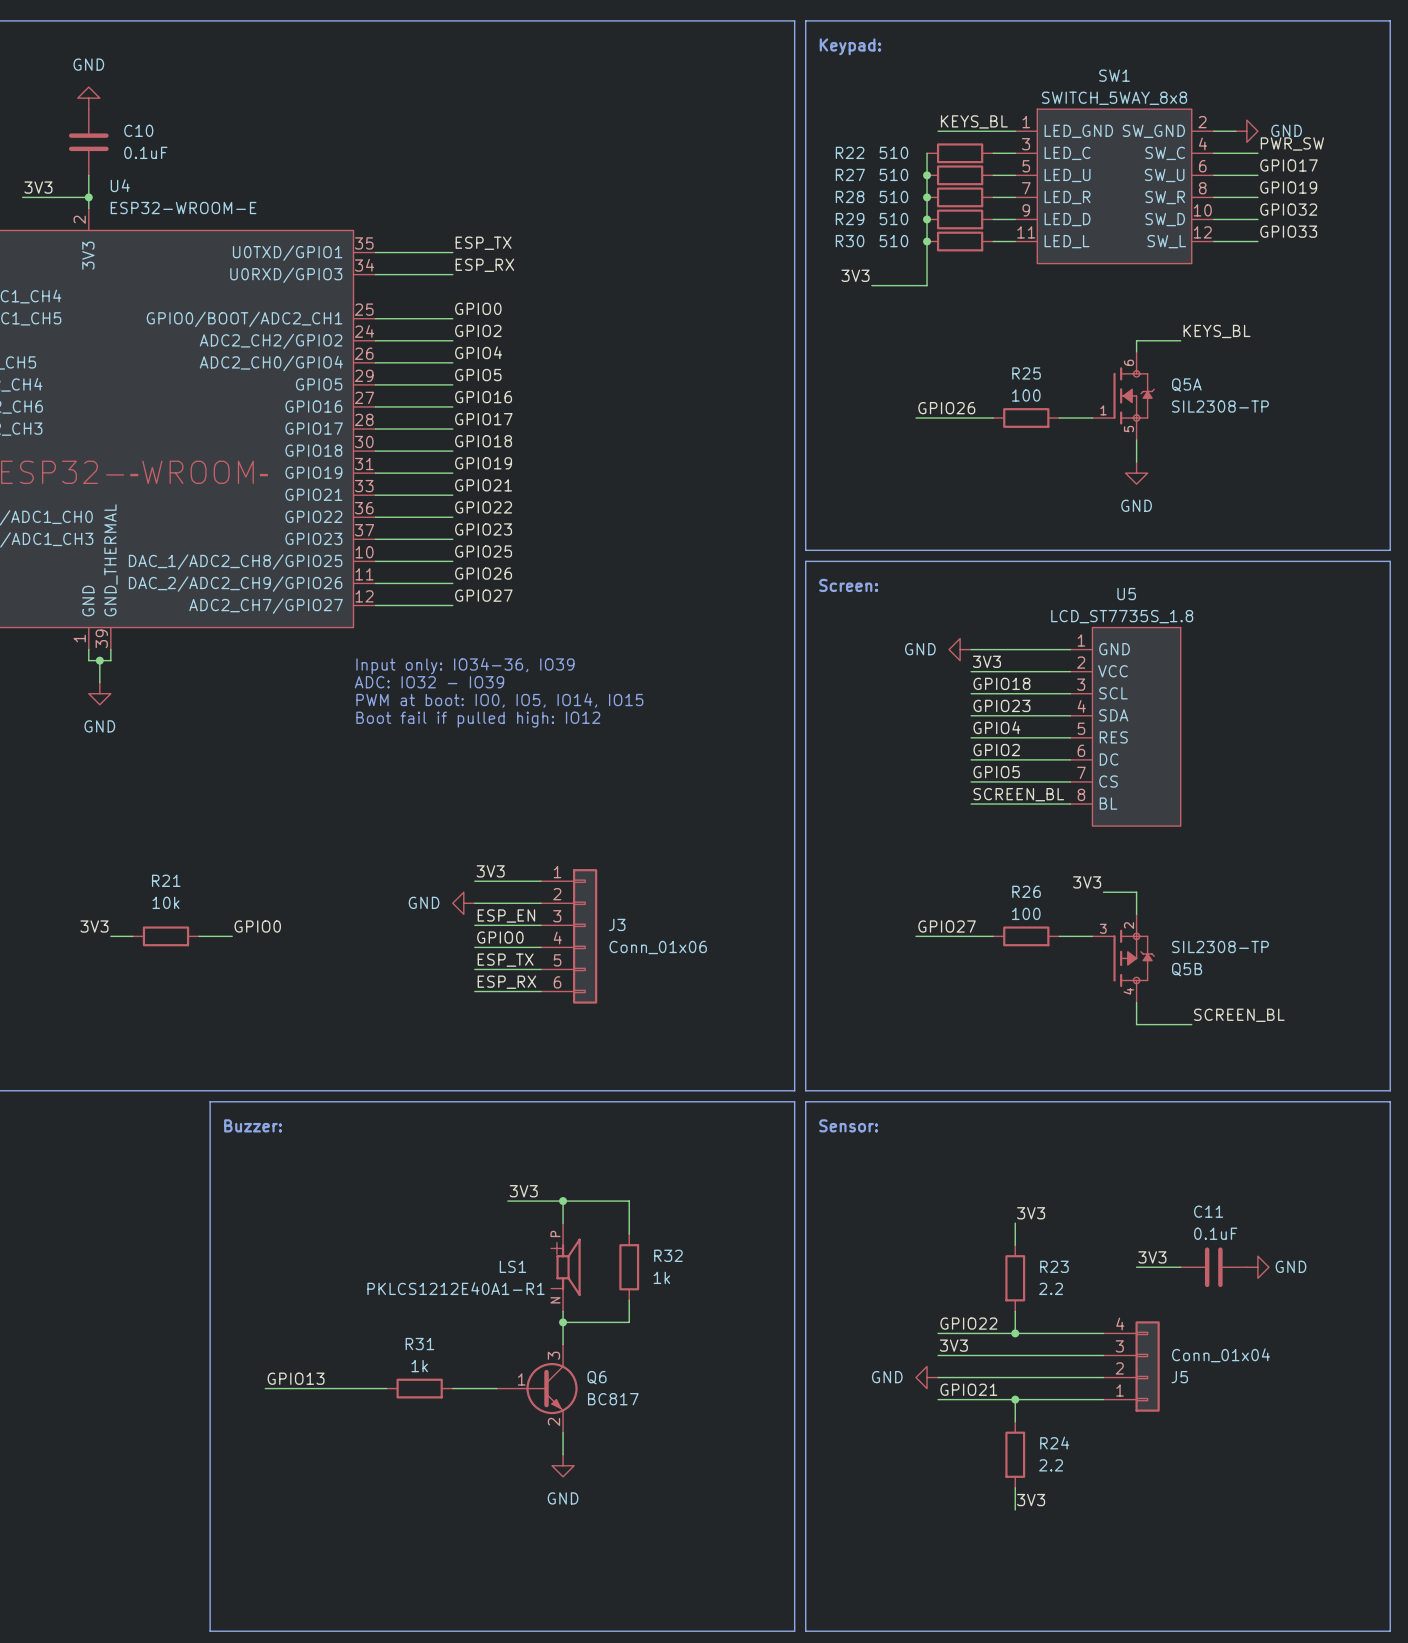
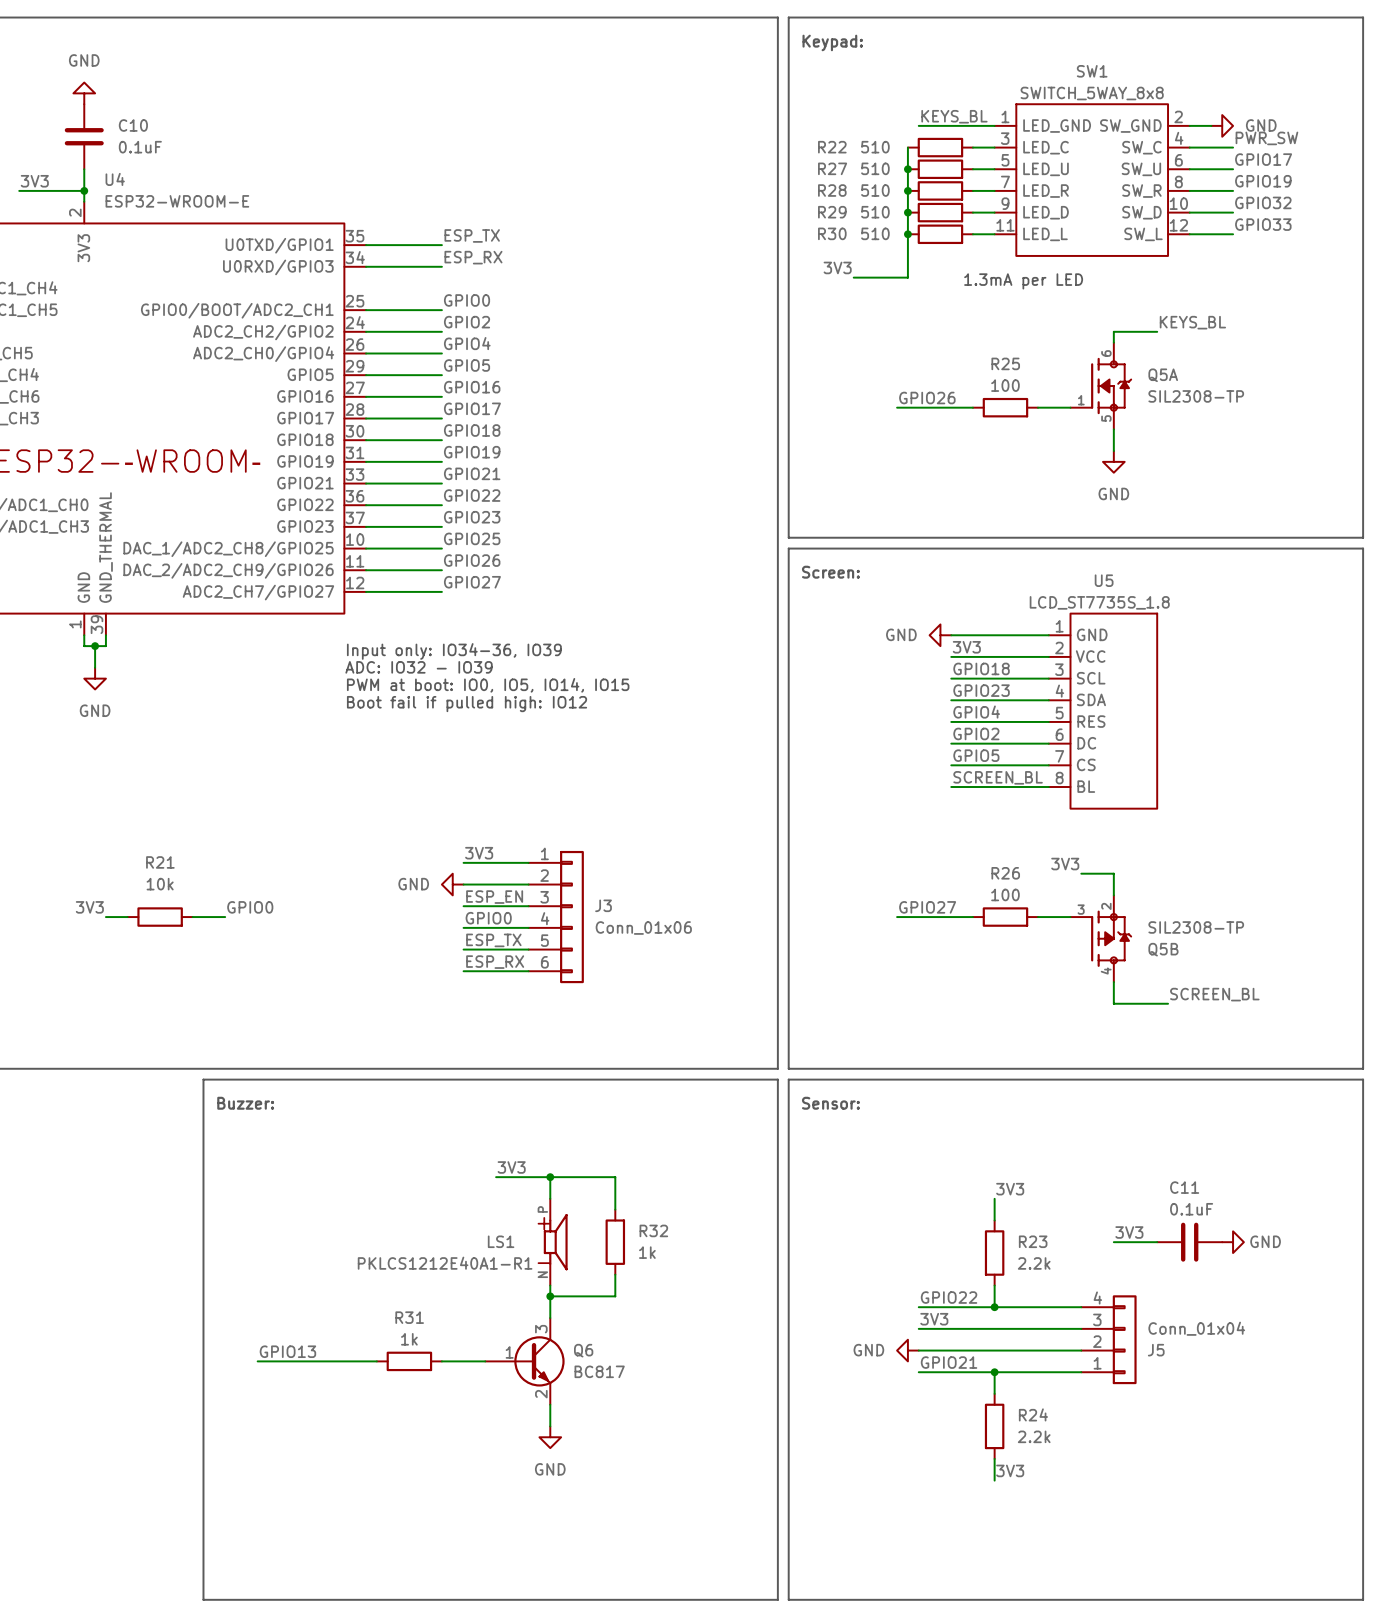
text: none -> 1.3mA per LED (1023, 281)
R23 value: 2.2 (1051, 1288) -> 2.2k (1034, 1263)
R24 value: 2.2 (1051, 1465) -> 2.2k (1034, 1436)

